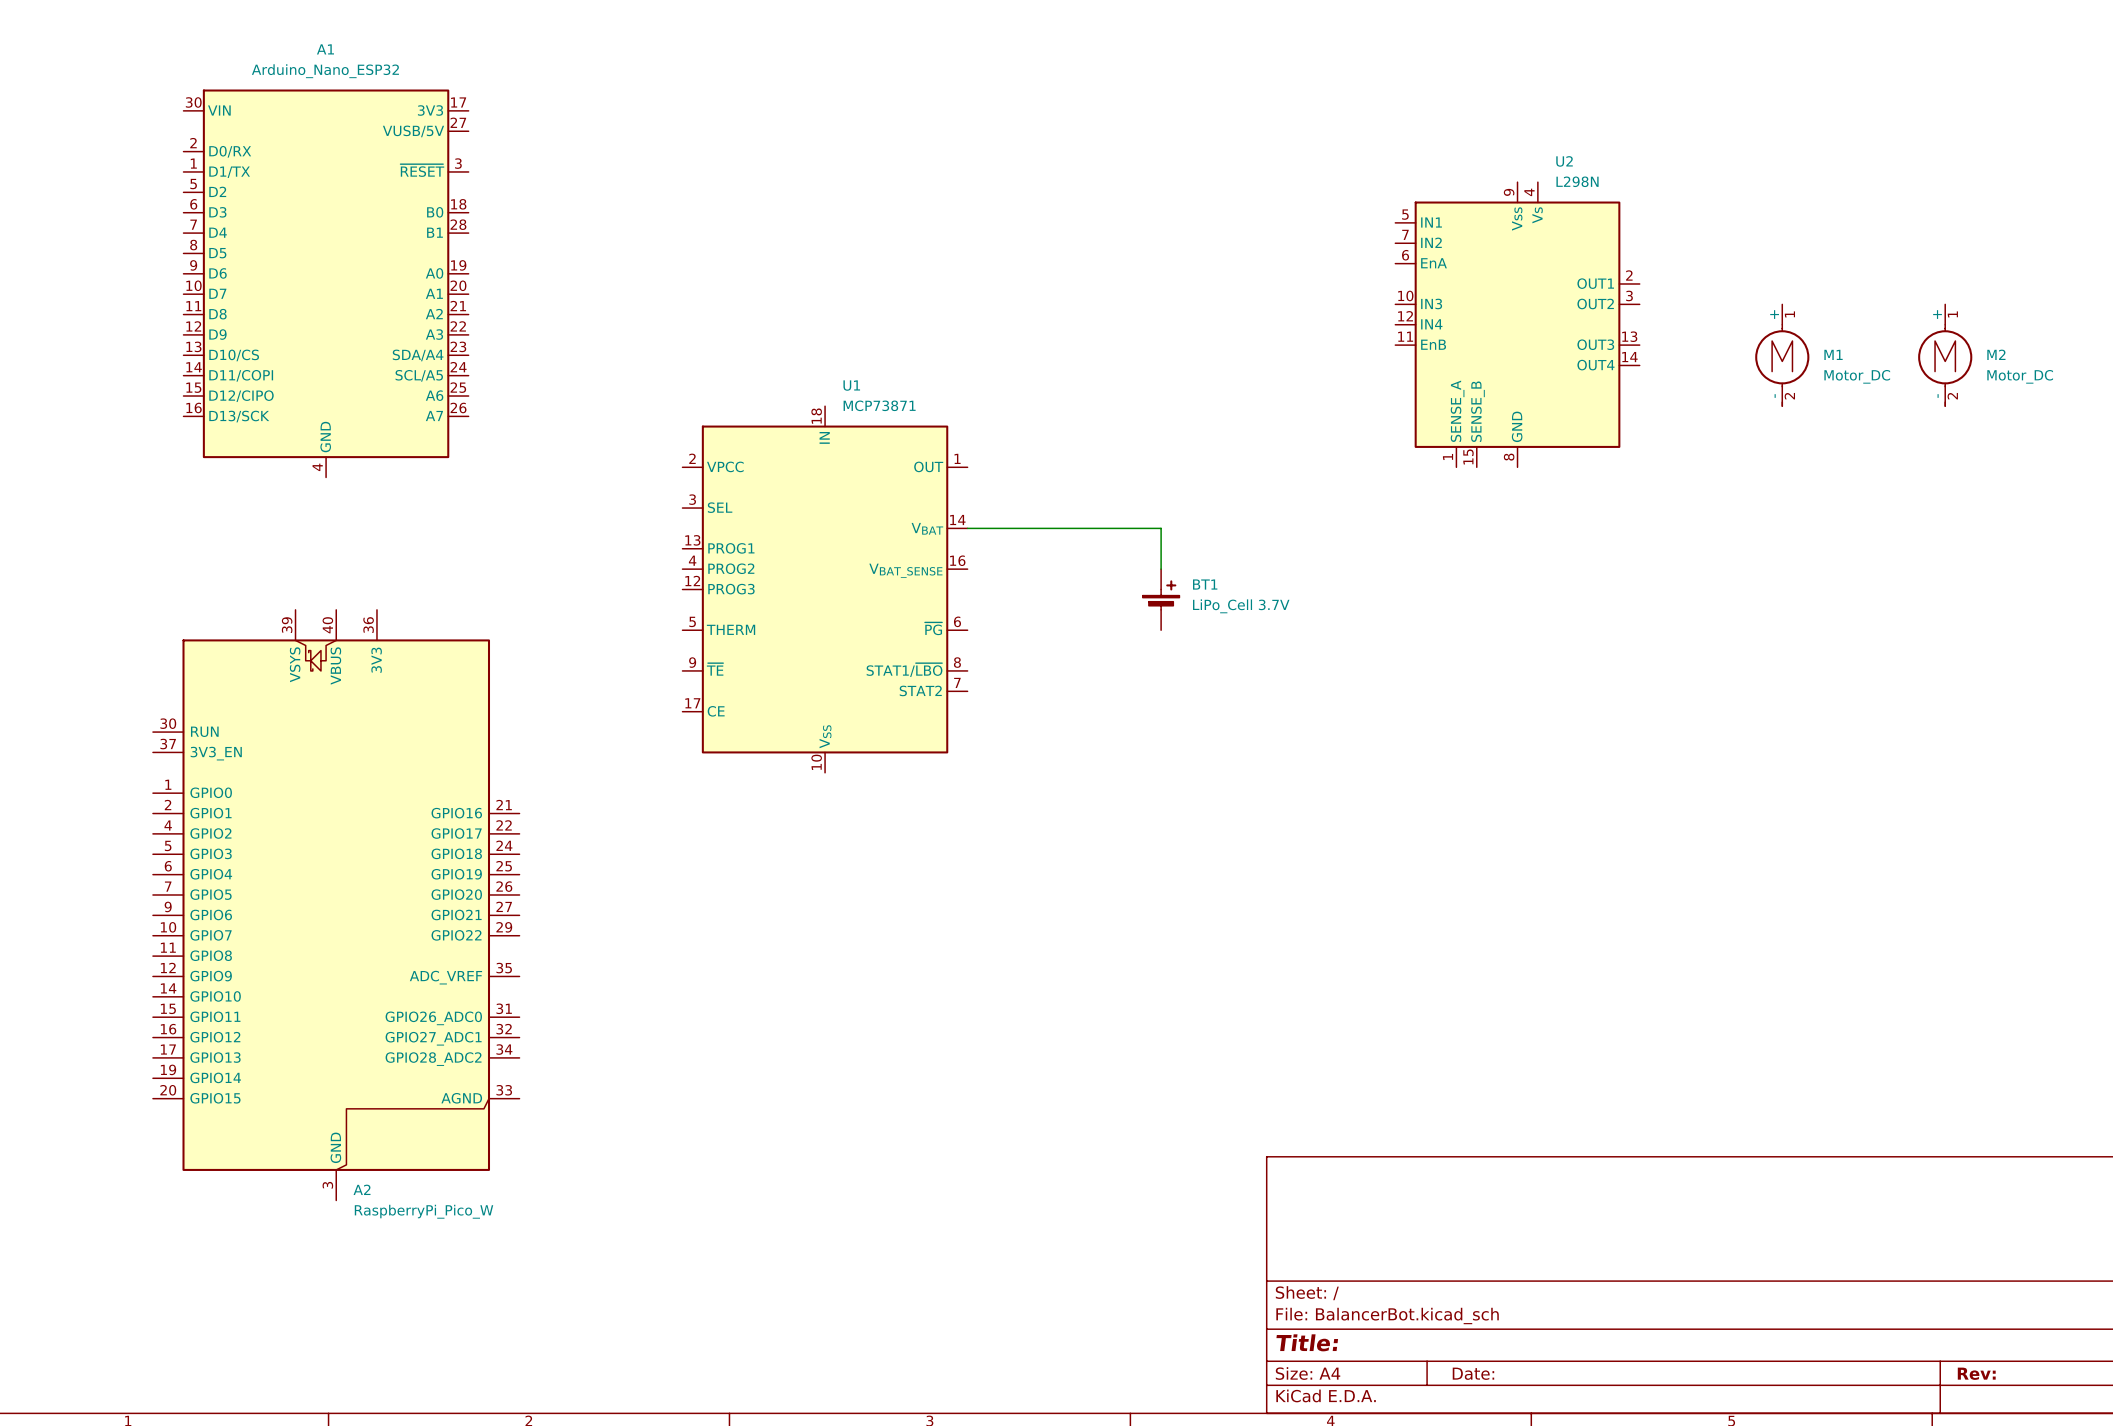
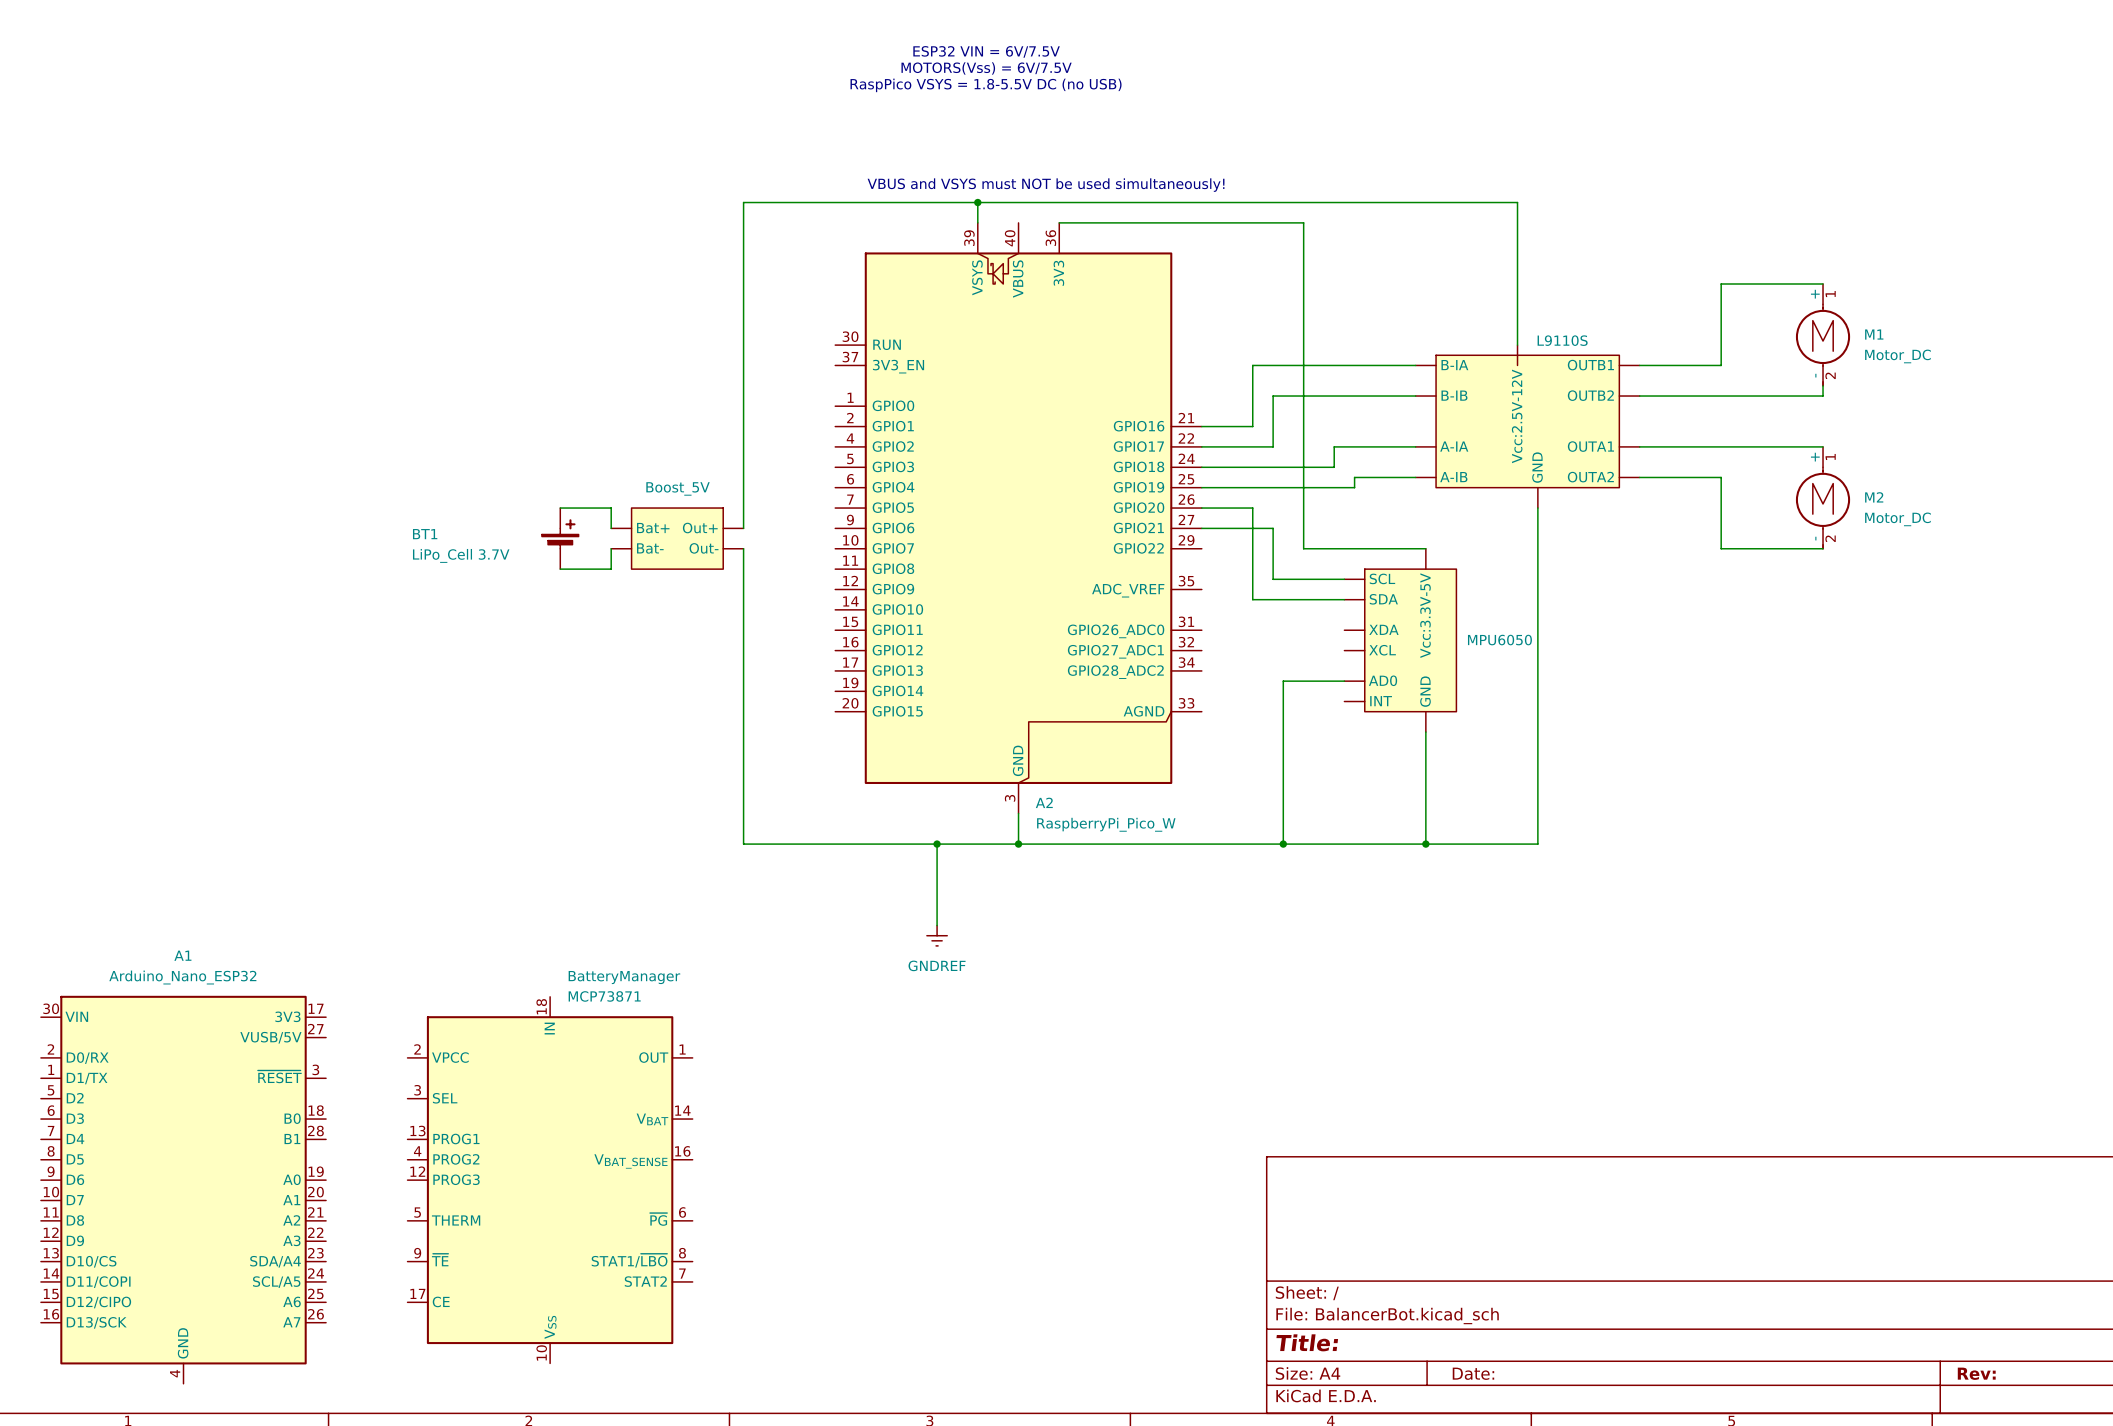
text: none -> ESP32 VIN = 6V/7.5V (986, 51)
text: none -> MOTORS(Vss) = 6V/7.5V (986, 68)
text: none -> RaspPico VSYS = 1.8-5.5V DC (no USB) (986, 85)
text: none -> VBUS and VSYS must NOT be used simultaneously! (1046, 185)
wire: none -> (977, 202) (977, 222)
junction: none -> (977, 202)
wire: none -> (1059, 222) (1303, 222) (1303, 548) (1425, 548)
A1 position: (326, 283) -> (183, 1189)
wire: none -> (1823, 283) (1721, 283) (1721, 365) (1639, 365)
U2: L298N (1517, 324) -> none
wire: none -> (1517, 345) (1517, 202) (743, 202) (743, 528)
M1 position: (1782, 355) -> (1823, 334)
M2 position: (1945, 355) -> (1823, 497)
wire: none -> (1415, 365) (1252, 365) (1252, 426) (1201, 426)
wire: none -> (1823, 385) (1823, 396) (1639, 396)
wire: none -> (1415, 396) (1273, 396) (1273, 446) (1201, 446)
L9110S: none -> (1527, 426)
wire: none -> (1415, 446) (1334, 446) (1334, 467) (1201, 467)
wire: none -> (1639, 446) (1823, 446)
wire: none -> (1415, 477) (1354, 477) (1354, 487) (1201, 487)
wire: none -> (1639, 477) (1721, 477) (1721, 548) (1823, 548)
wire: none -> (560, 508) (611, 508) (611, 528)
wire: none -> (1201, 508) (1252, 508) (1252, 599) (1344, 599)
wire: none -> (1537, 508) (1537, 844) (743, 844) (743, 548)
wire: none -> (1201, 528) (1273, 528) (1273, 579) (1344, 579)
Boost_5V: none -> (677, 538)
wire: none -> (611, 548) (611, 569) (560, 569)
BT1 name position: BT1 (1205, 584) -> BT1 (425, 534)
U1: MCP73871 (825, 589) -> none
BT1 position: (1161, 599) -> (560, 538)
BT1 value position: LiPo_Cell 3.7V (1241, 606) -> LiPo_Cell 3.7V (461, 555)
MPU6050: none -> (1400, 640)
wire: none -> (1344, 681) (1283, 681) (1283, 844)
wire: none -> (1425, 732) (1425, 844)
wire: none -> (1018, 813) (1018, 844)
wire: none -> (937, 844) (937, 925)
junction: none -> (937, 844)
junction: none -> (1018, 844)
junction: none -> (1283, 844)
junction: none -> (1425, 844)
A2 position: (336, 905) -> (1018, 518)
power symbol: none -> GNDREF (937, 935)
BatteryManager: none -> MCP73871 (550, 1180)

